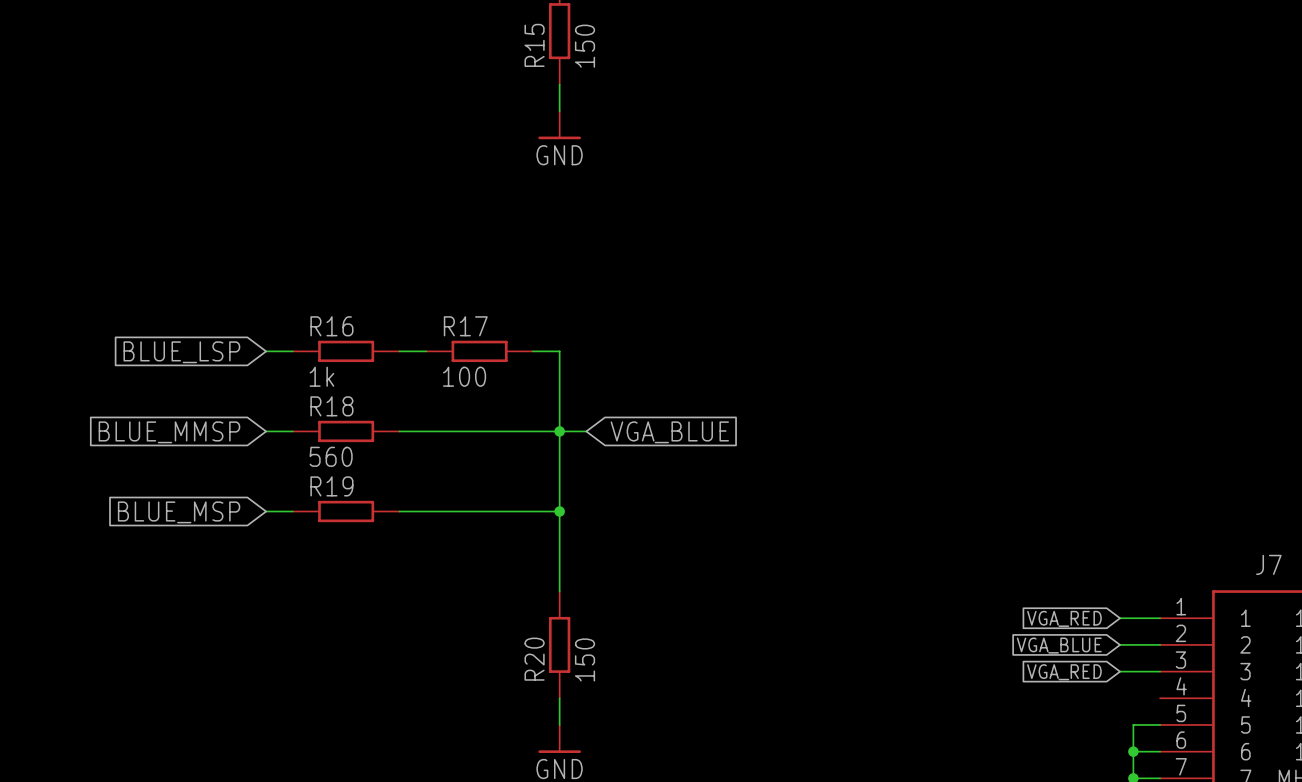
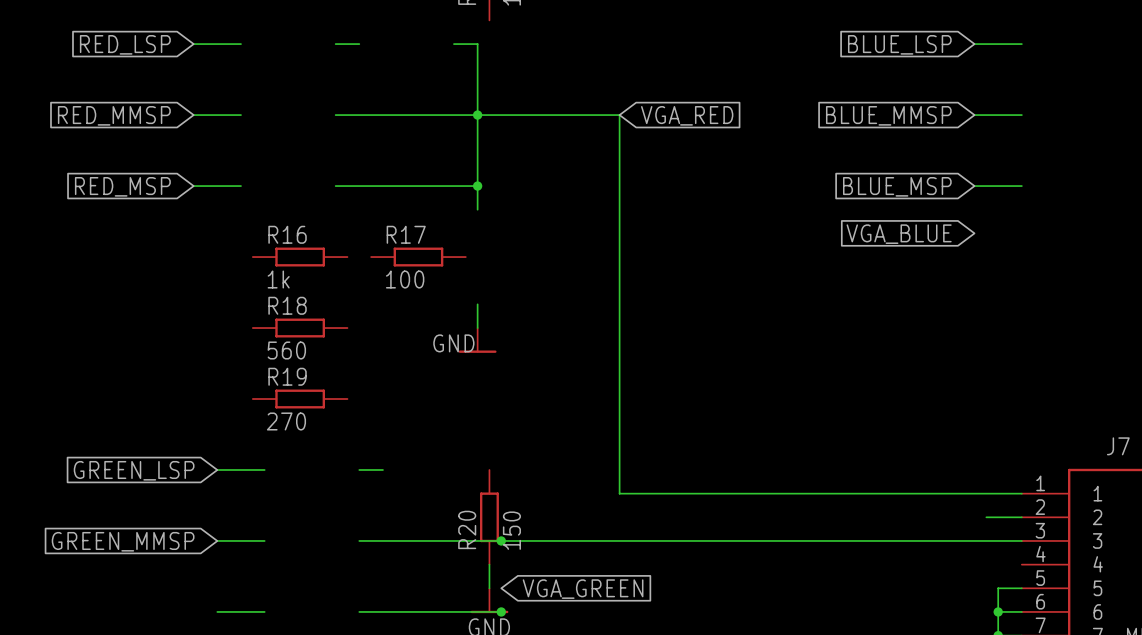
wire: (559, 84) (559, 111) -> none
wire: none -> (193, 44) (240, 44)
wire: none -> (453, 44) (477, 44) (477, 209)
wire: none -> (974, 44) (1021, 44)
global label: none -> RED_LSP (125, 44)
global label: none -> BLUE_LSP (899, 44)
power symbol: GND (559, 125) -> none
wire: none -> (193, 115) (240, 115)
wire: none -> (335, 115) (619, 115) (619, 493) (986, 493)
junction: none -> (477, 115)
wire: none -> (974, 115) (1021, 115)
global label: none -> RED_MMSP (114, 115)
global label: none -> VGA_RED (687, 115)
global label: none -> BLUE_MMSP (888, 115)
wire: none -> (193, 186) (240, 186)
junction: none -> (477, 186)
wire: none -> (974, 186) (1021, 186)
global label: none -> RED_MSP (122, 186)
global label: none -> BLUE_MSP (897, 186)
global label: none -> VGA_BLUE (899, 234)
wire: (266, 351) (292, 351) -> none
wire: (399, 351) (426, 351) -> (335, 44) (359, 44)
wire: (532, 351) (559, 351) (559, 591) -> none
global label: BLUE_LSP (181, 352) -> none
wire: none -> (477, 304) (477, 328)
wire: (266, 431) (292, 431) -> none
wire: (399, 431) (586, 431) -> none
junction: (559, 431) -> none
global label: BLUE_MMSP (169, 432) -> none
global label: VGA_BLUE (669, 432) -> none
power symbol: none -> GND (477, 340)
wire: (266, 511) (292, 511) -> (359, 469) (382, 469)
wire: (399, 511) (559, 511) -> (335, 186) (477, 186)
junction: (559, 511) -> none
global label: BLUE_MSP (179, 512) -> none
R19 value: none -> 270 (286, 421)
wire: none -> (217, 469) (264, 469)
global label: none -> GREEN_LSP (134, 470)
global label: VGA_RED (1064, 618) -> none
global label: VGA_BLUE (1059, 645) -> none
wire: none -> (217, 540) (264, 540)
wire: none -> (359, 540) (986, 540)
junction: none -> (501, 540)
global label: none -> GREEN_MMSP (123, 541)
global label: VGA_RED (1064, 672) -> none
global label: none -> VGA_GREEN (583, 589)
wire: none -> (217, 611) (264, 611)
wire: none -> (359, 611) (501, 611)
junction: none -> (501, 611)

